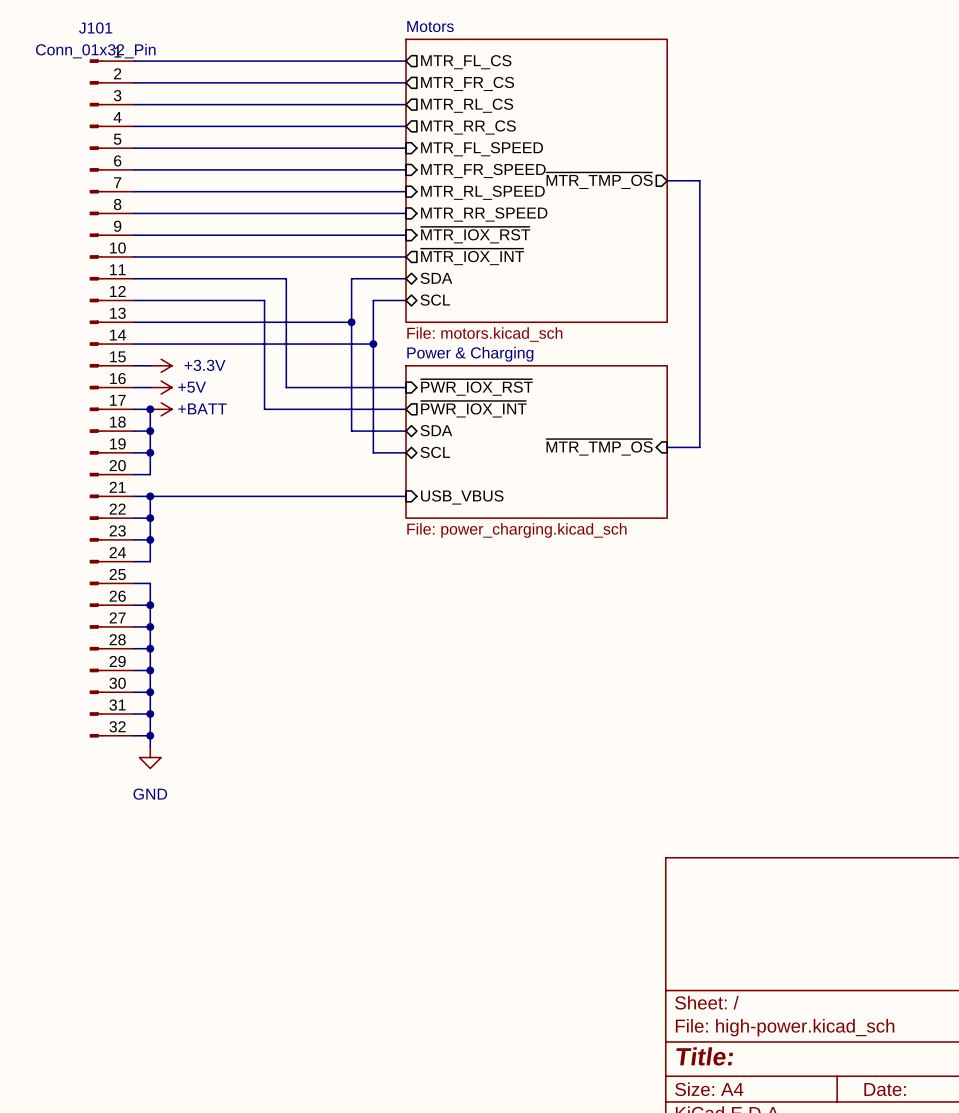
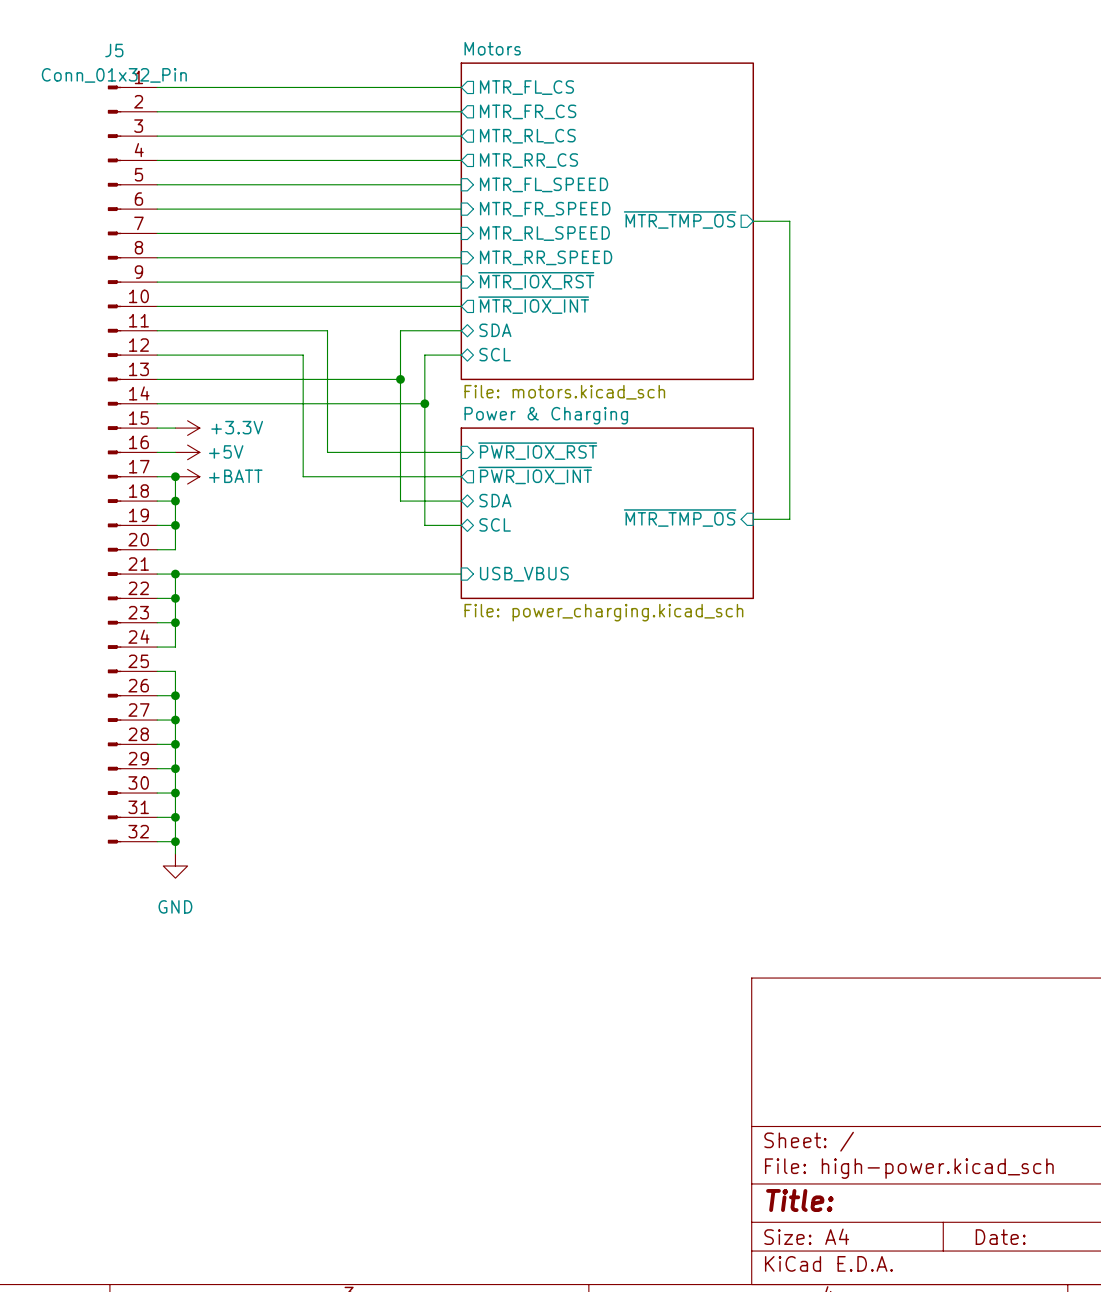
J101 name: J101 (95, 28) -> J5 (114, 50)

